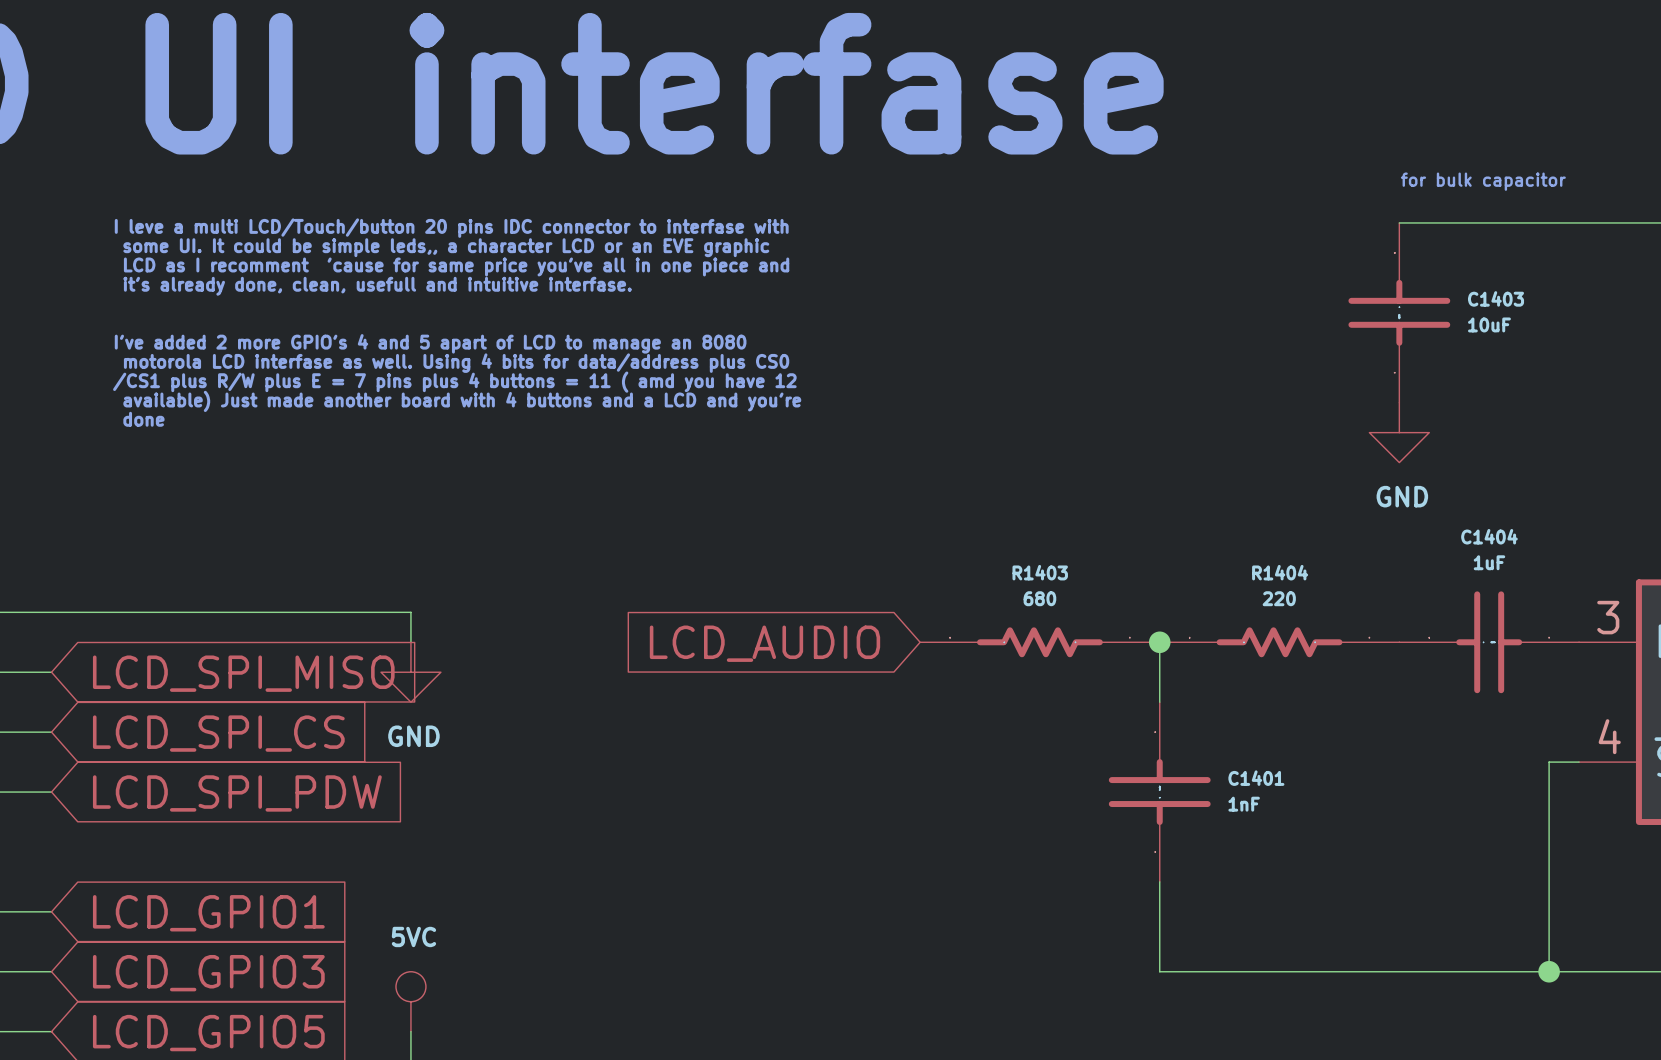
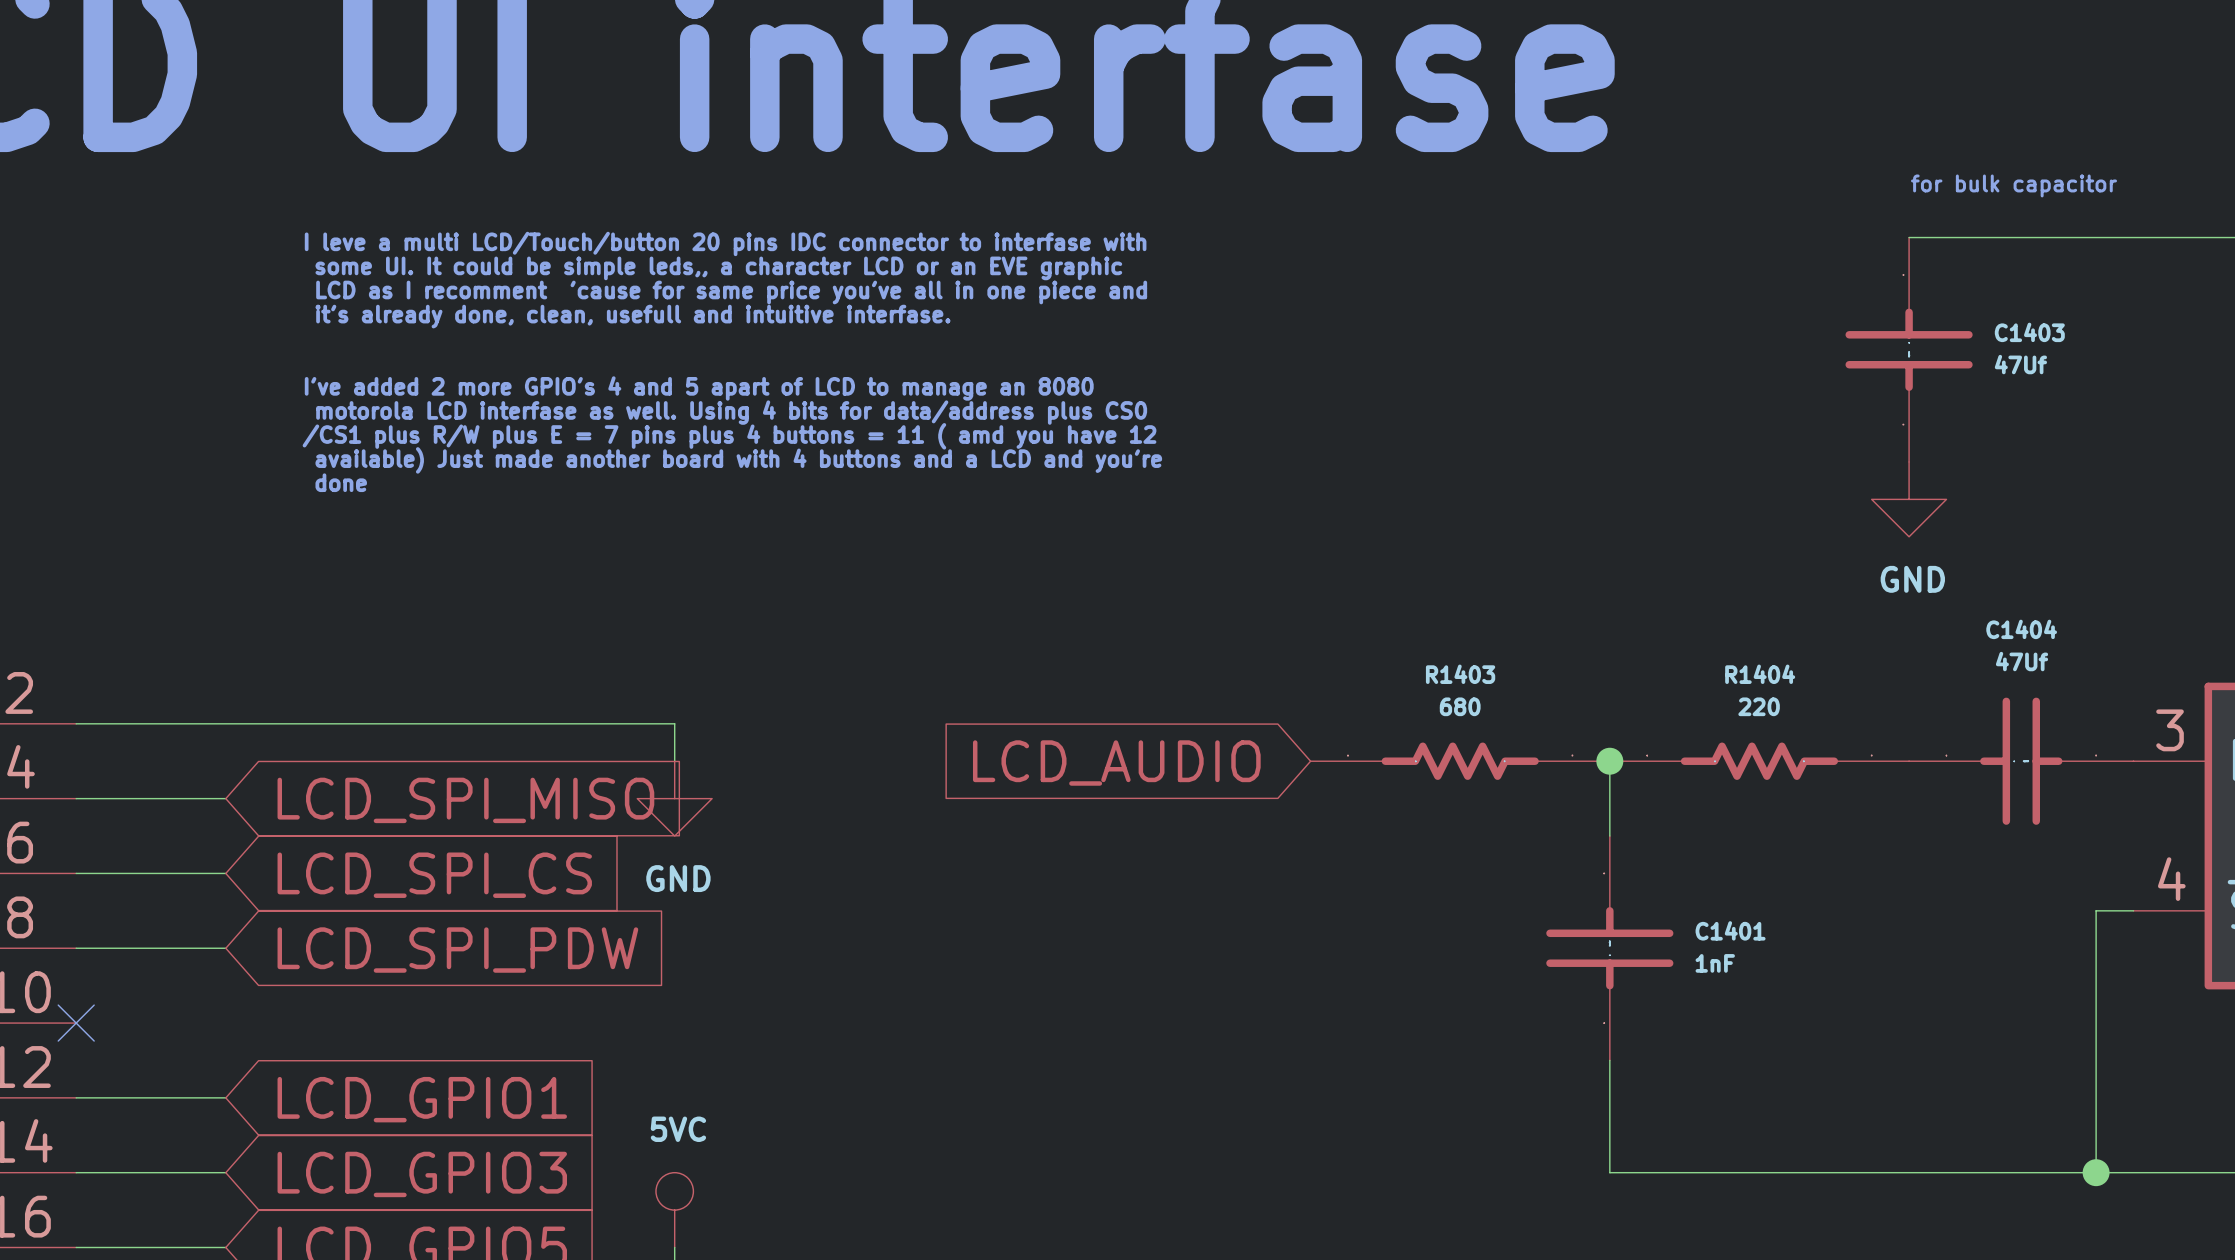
C1403 value: 10uF (1489, 324) -> 47Uf (2020, 364)
C1404 value: 1uF (1489, 562) -> 47Uf (2022, 661)

